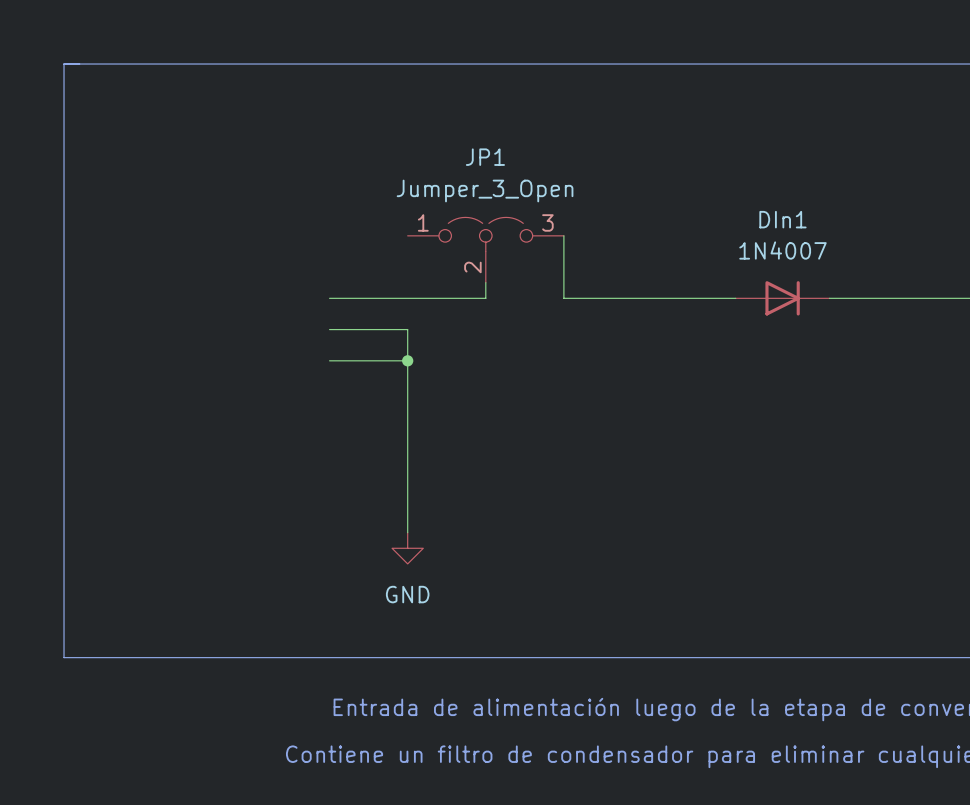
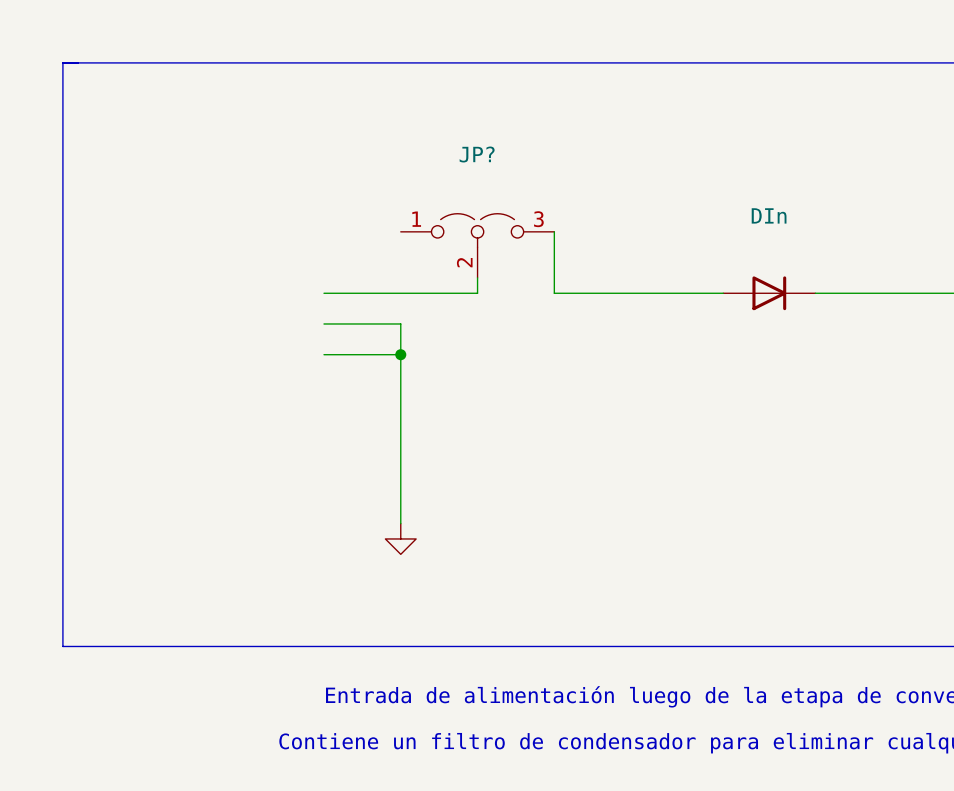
JP1 name: JP1 (485, 157) -> JP? (477, 154)
JP1 value: Jumper_3_Open (485, 191) -> none
DIn1 name: DIn1 (782, 219) -> DIn (769, 215)
DIn1 value: 1N4007 (782, 250) -> none
power symbol text: GND (407, 594) -> none

